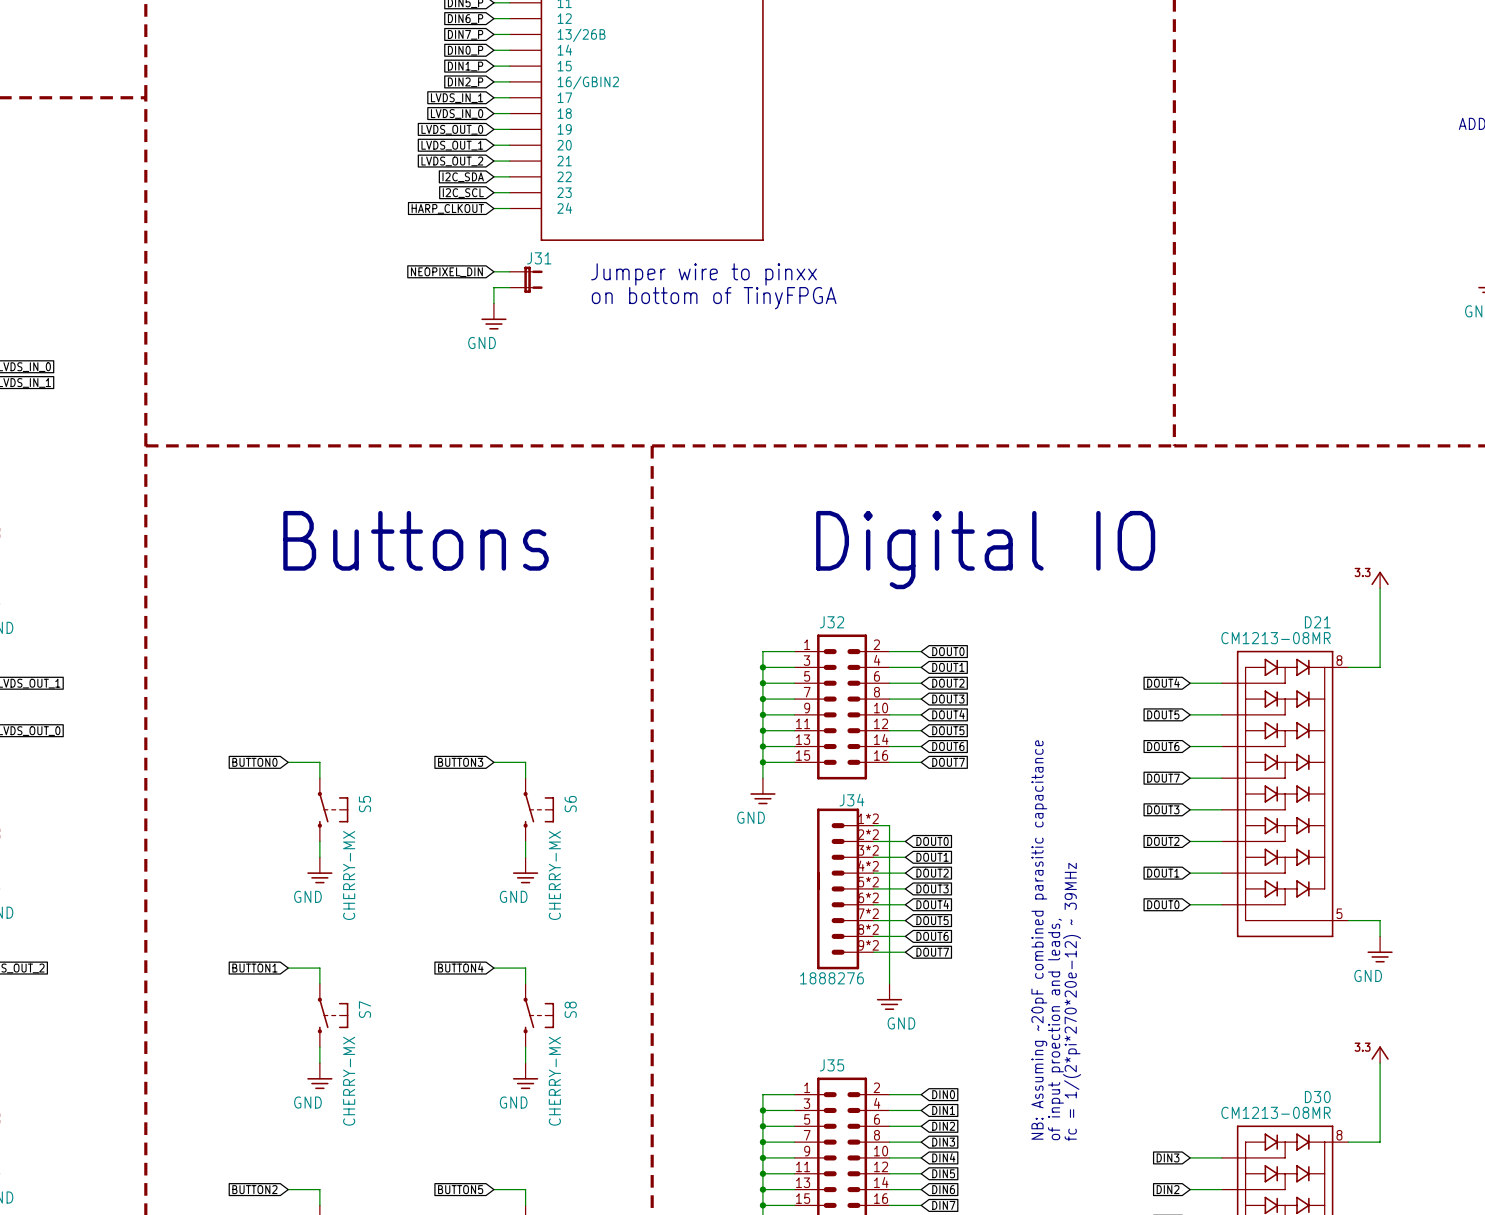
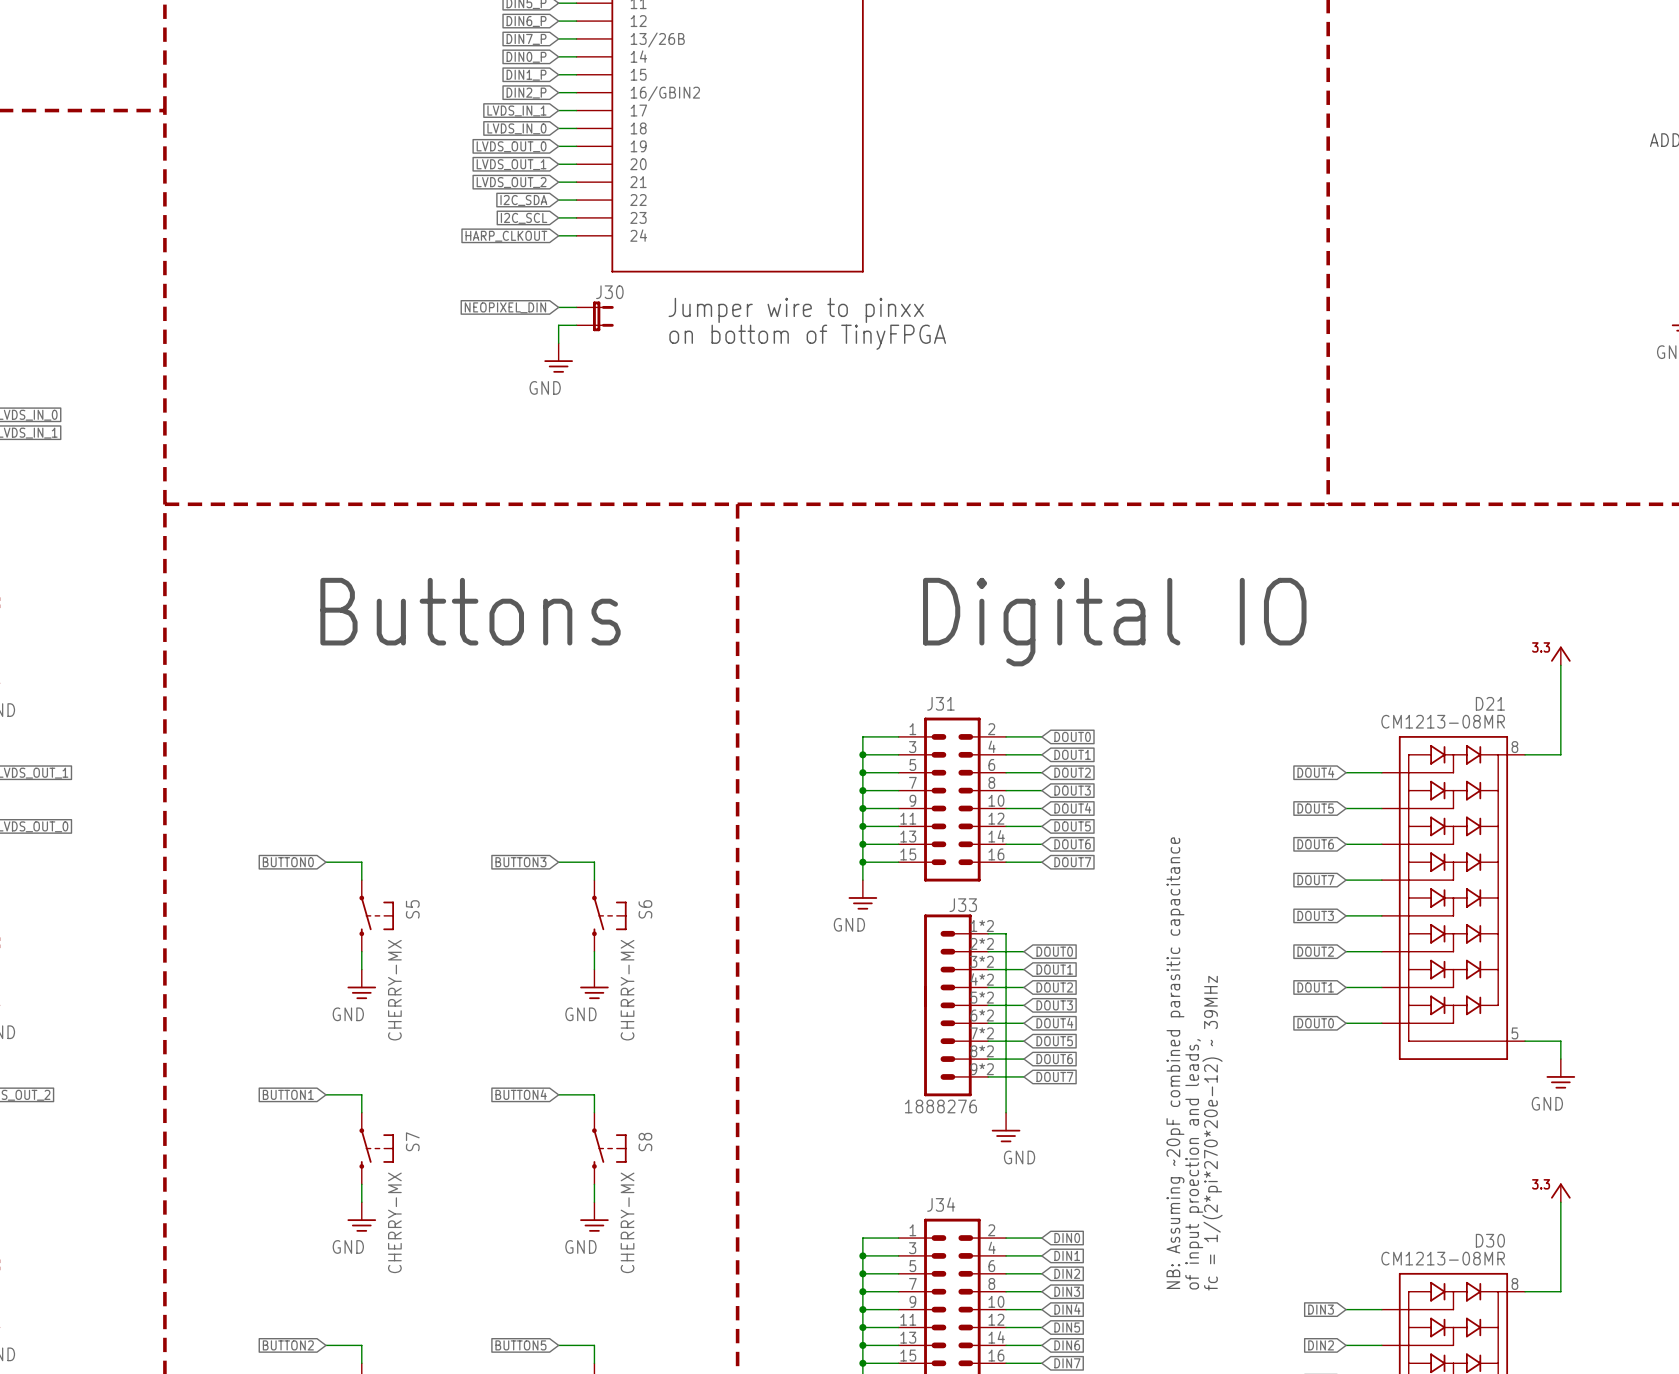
J31 name: J31 (539, 258) -> J30 (609, 292)
J32 name: J32 (831, 622) -> J31 (940, 703)
J34 name: J34 (851, 800) -> J33 (963, 905)
J35 name: J35 (831, 1065) -> J34 (941, 1204)

